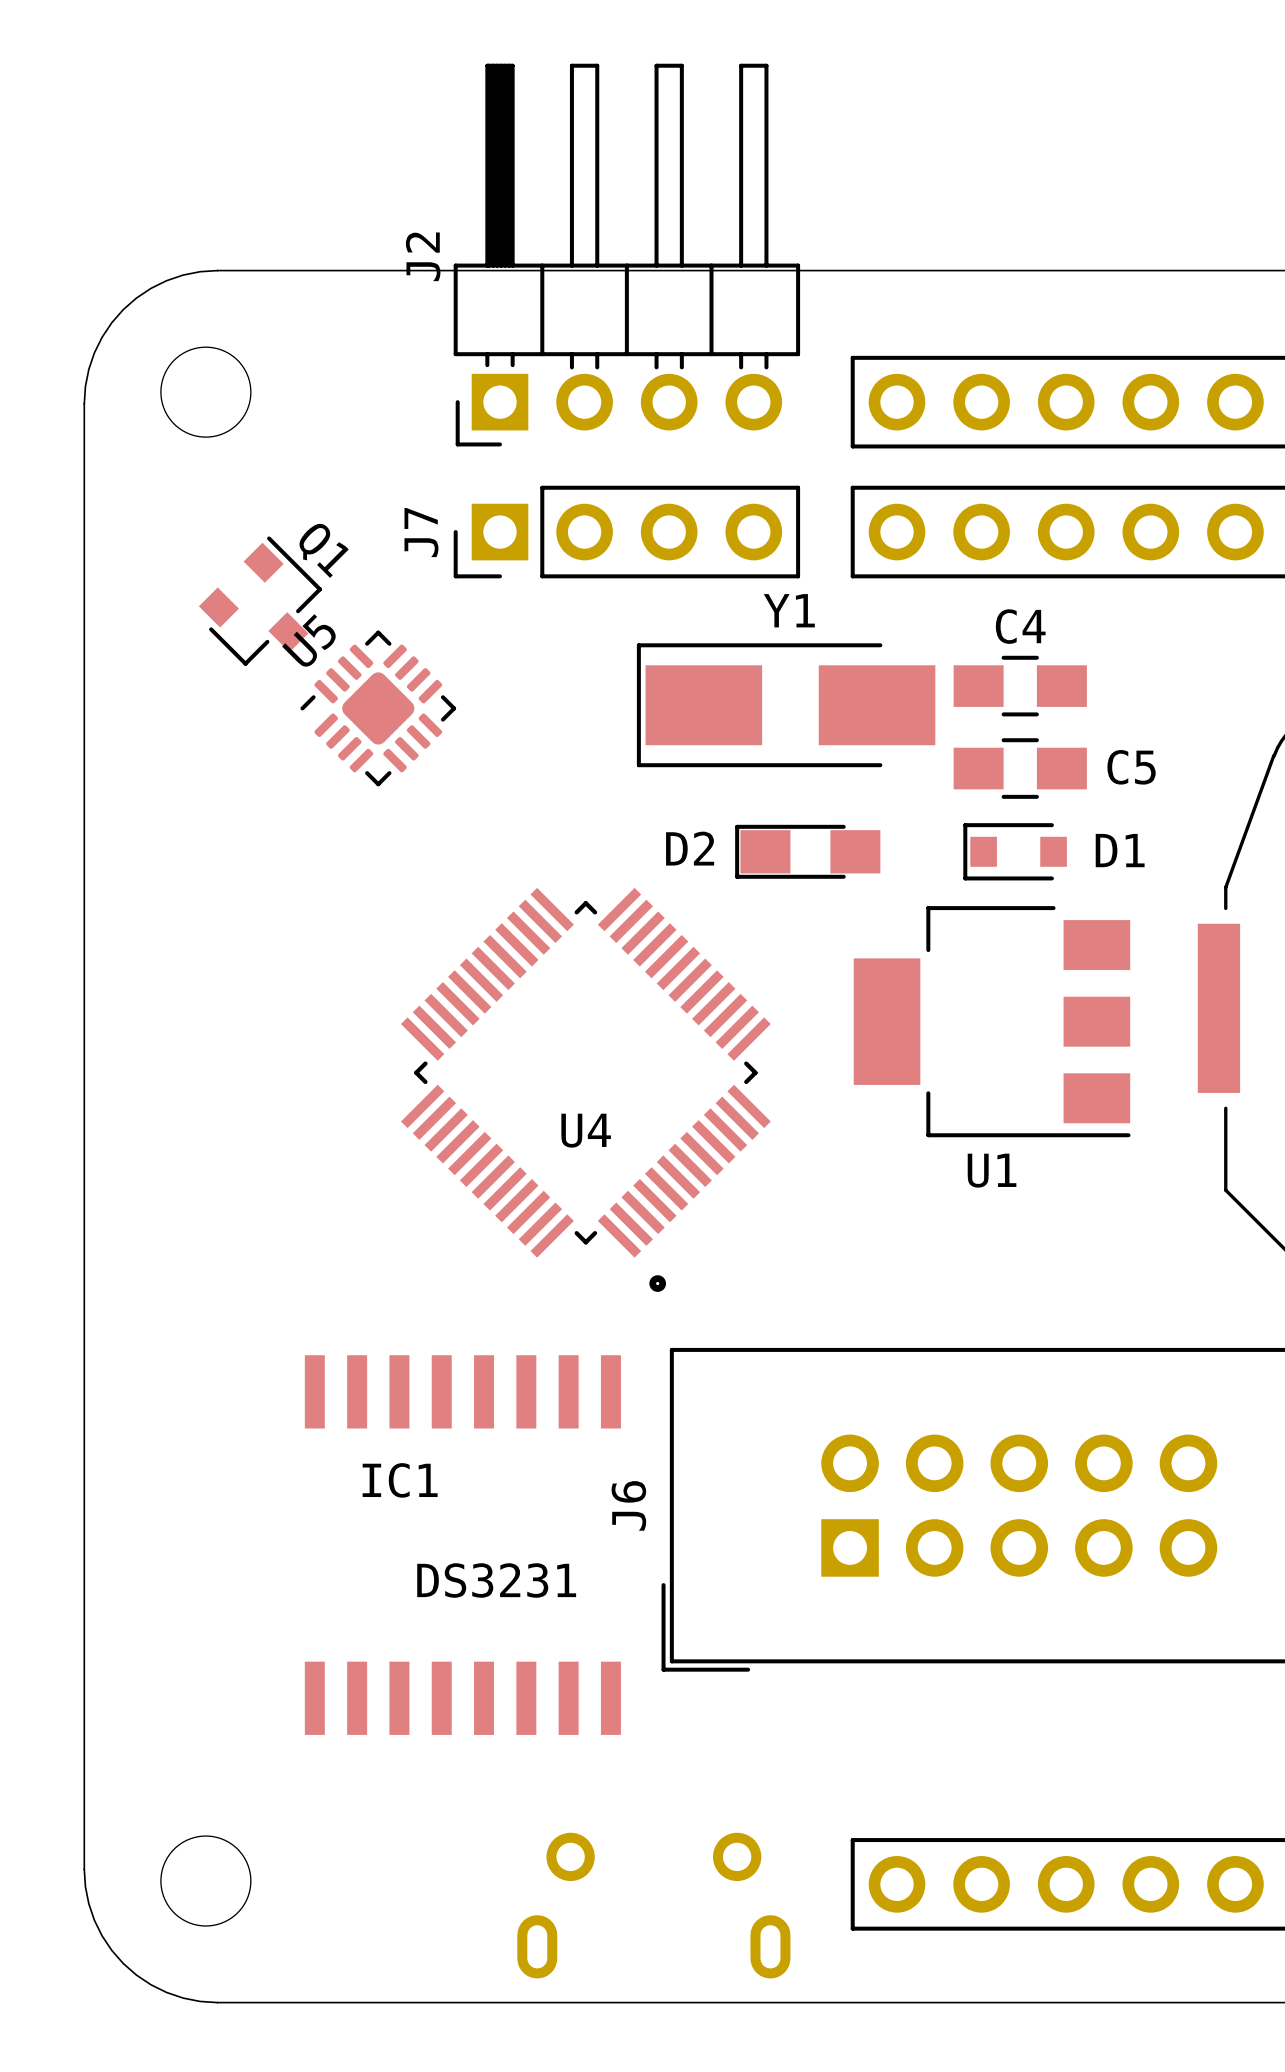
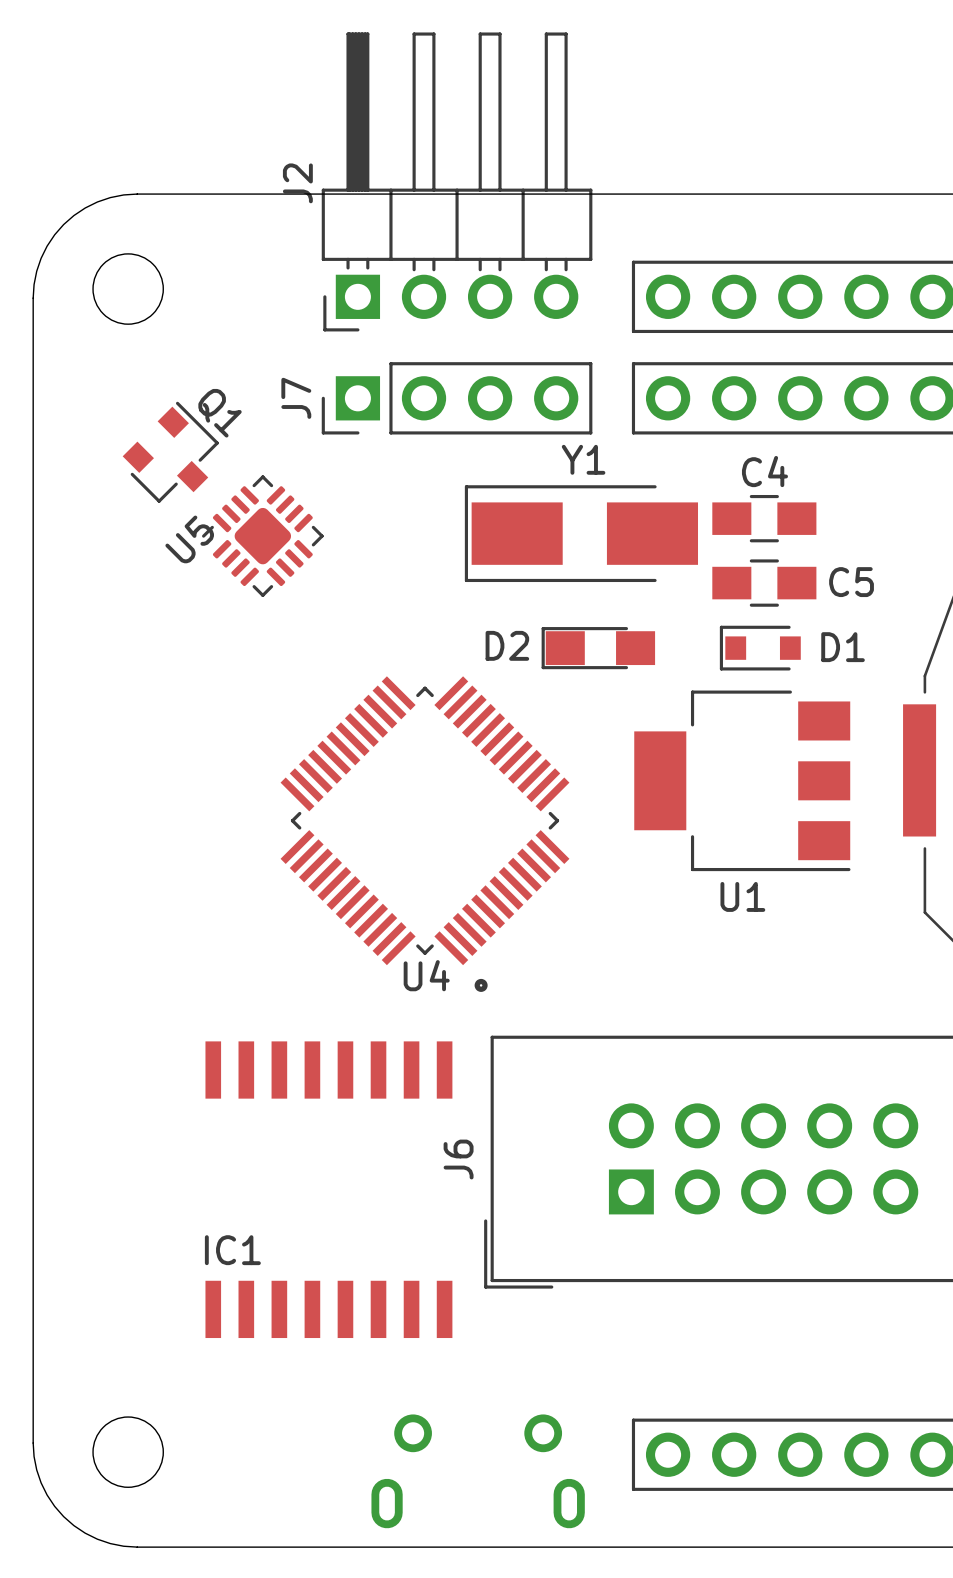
U5 name position: U5 (308, 640) -> U5 (189, 539)
U4 name position: U4 (586, 1130) -> U4 (426, 975)
IC1 name position: IC1 (400, 1480) -> IC1 (232, 1250)
IC1 value: DS3231 (496, 1580) -> none

